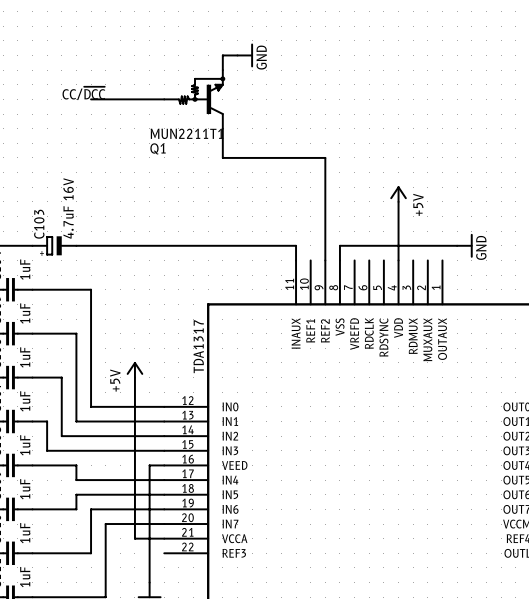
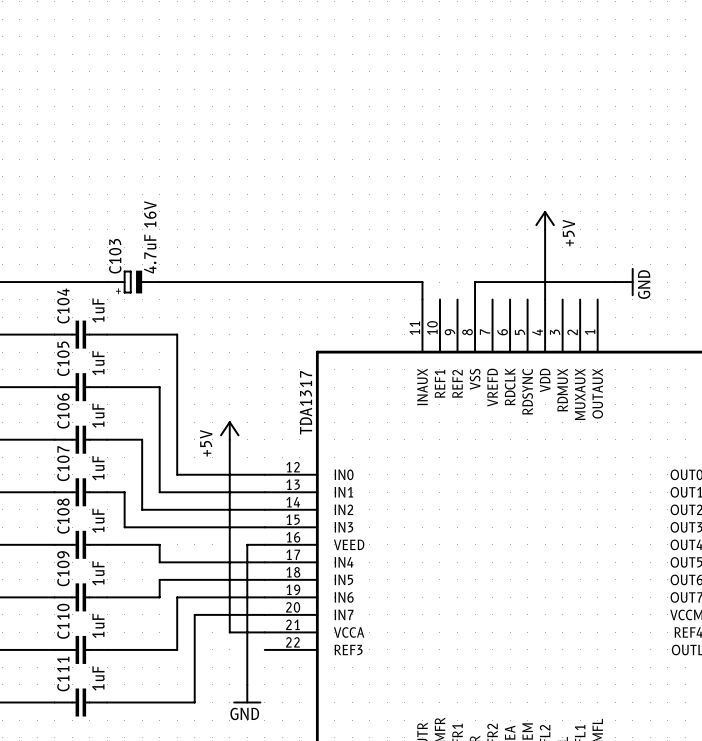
wire: (237, 55) (222, 55) (222, 70) -> none
power symbol: GND (245, 55) -> none
label: CC/~{DCC} (83, 93) -> none
wire: (91, 99) (164, 99) -> none
Q1: MUN2211T1 (194, 99) -> none
wire: (222, 128) (222, 157) (325, 157) (325, 260) -> none

